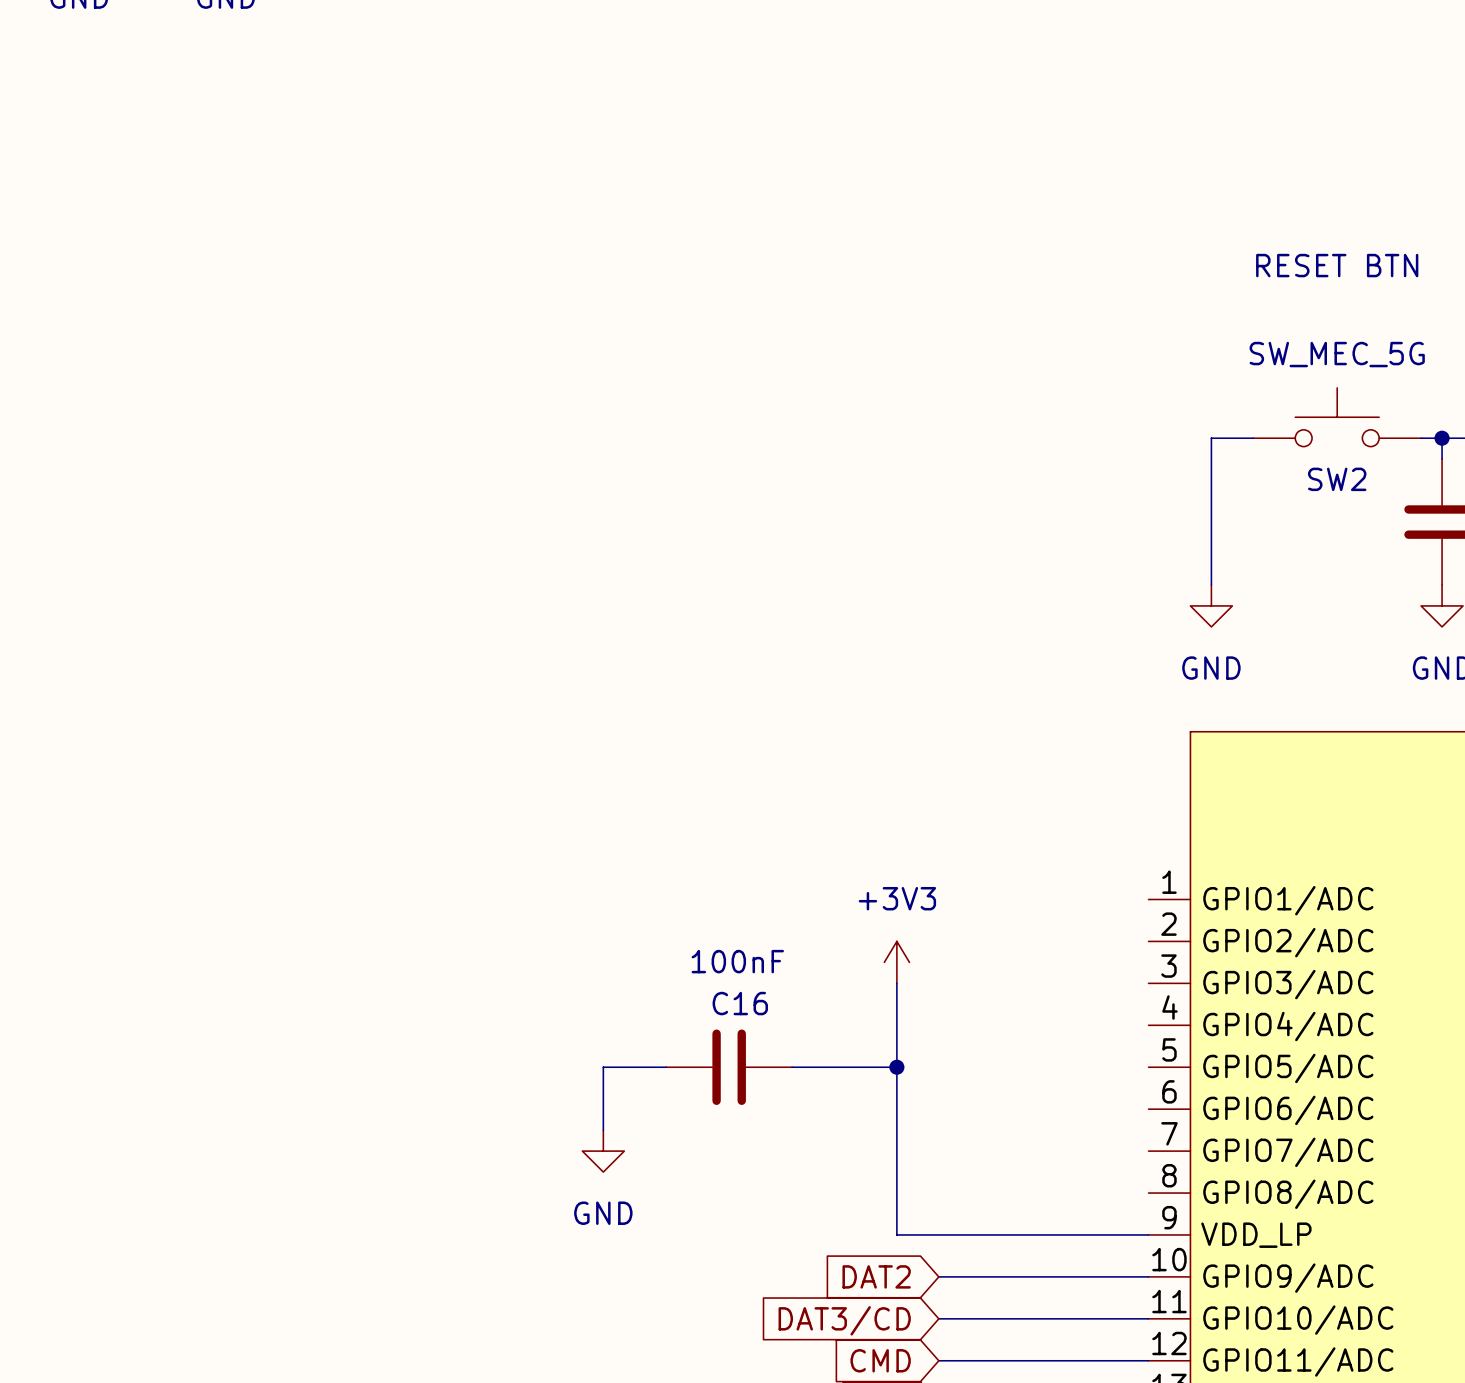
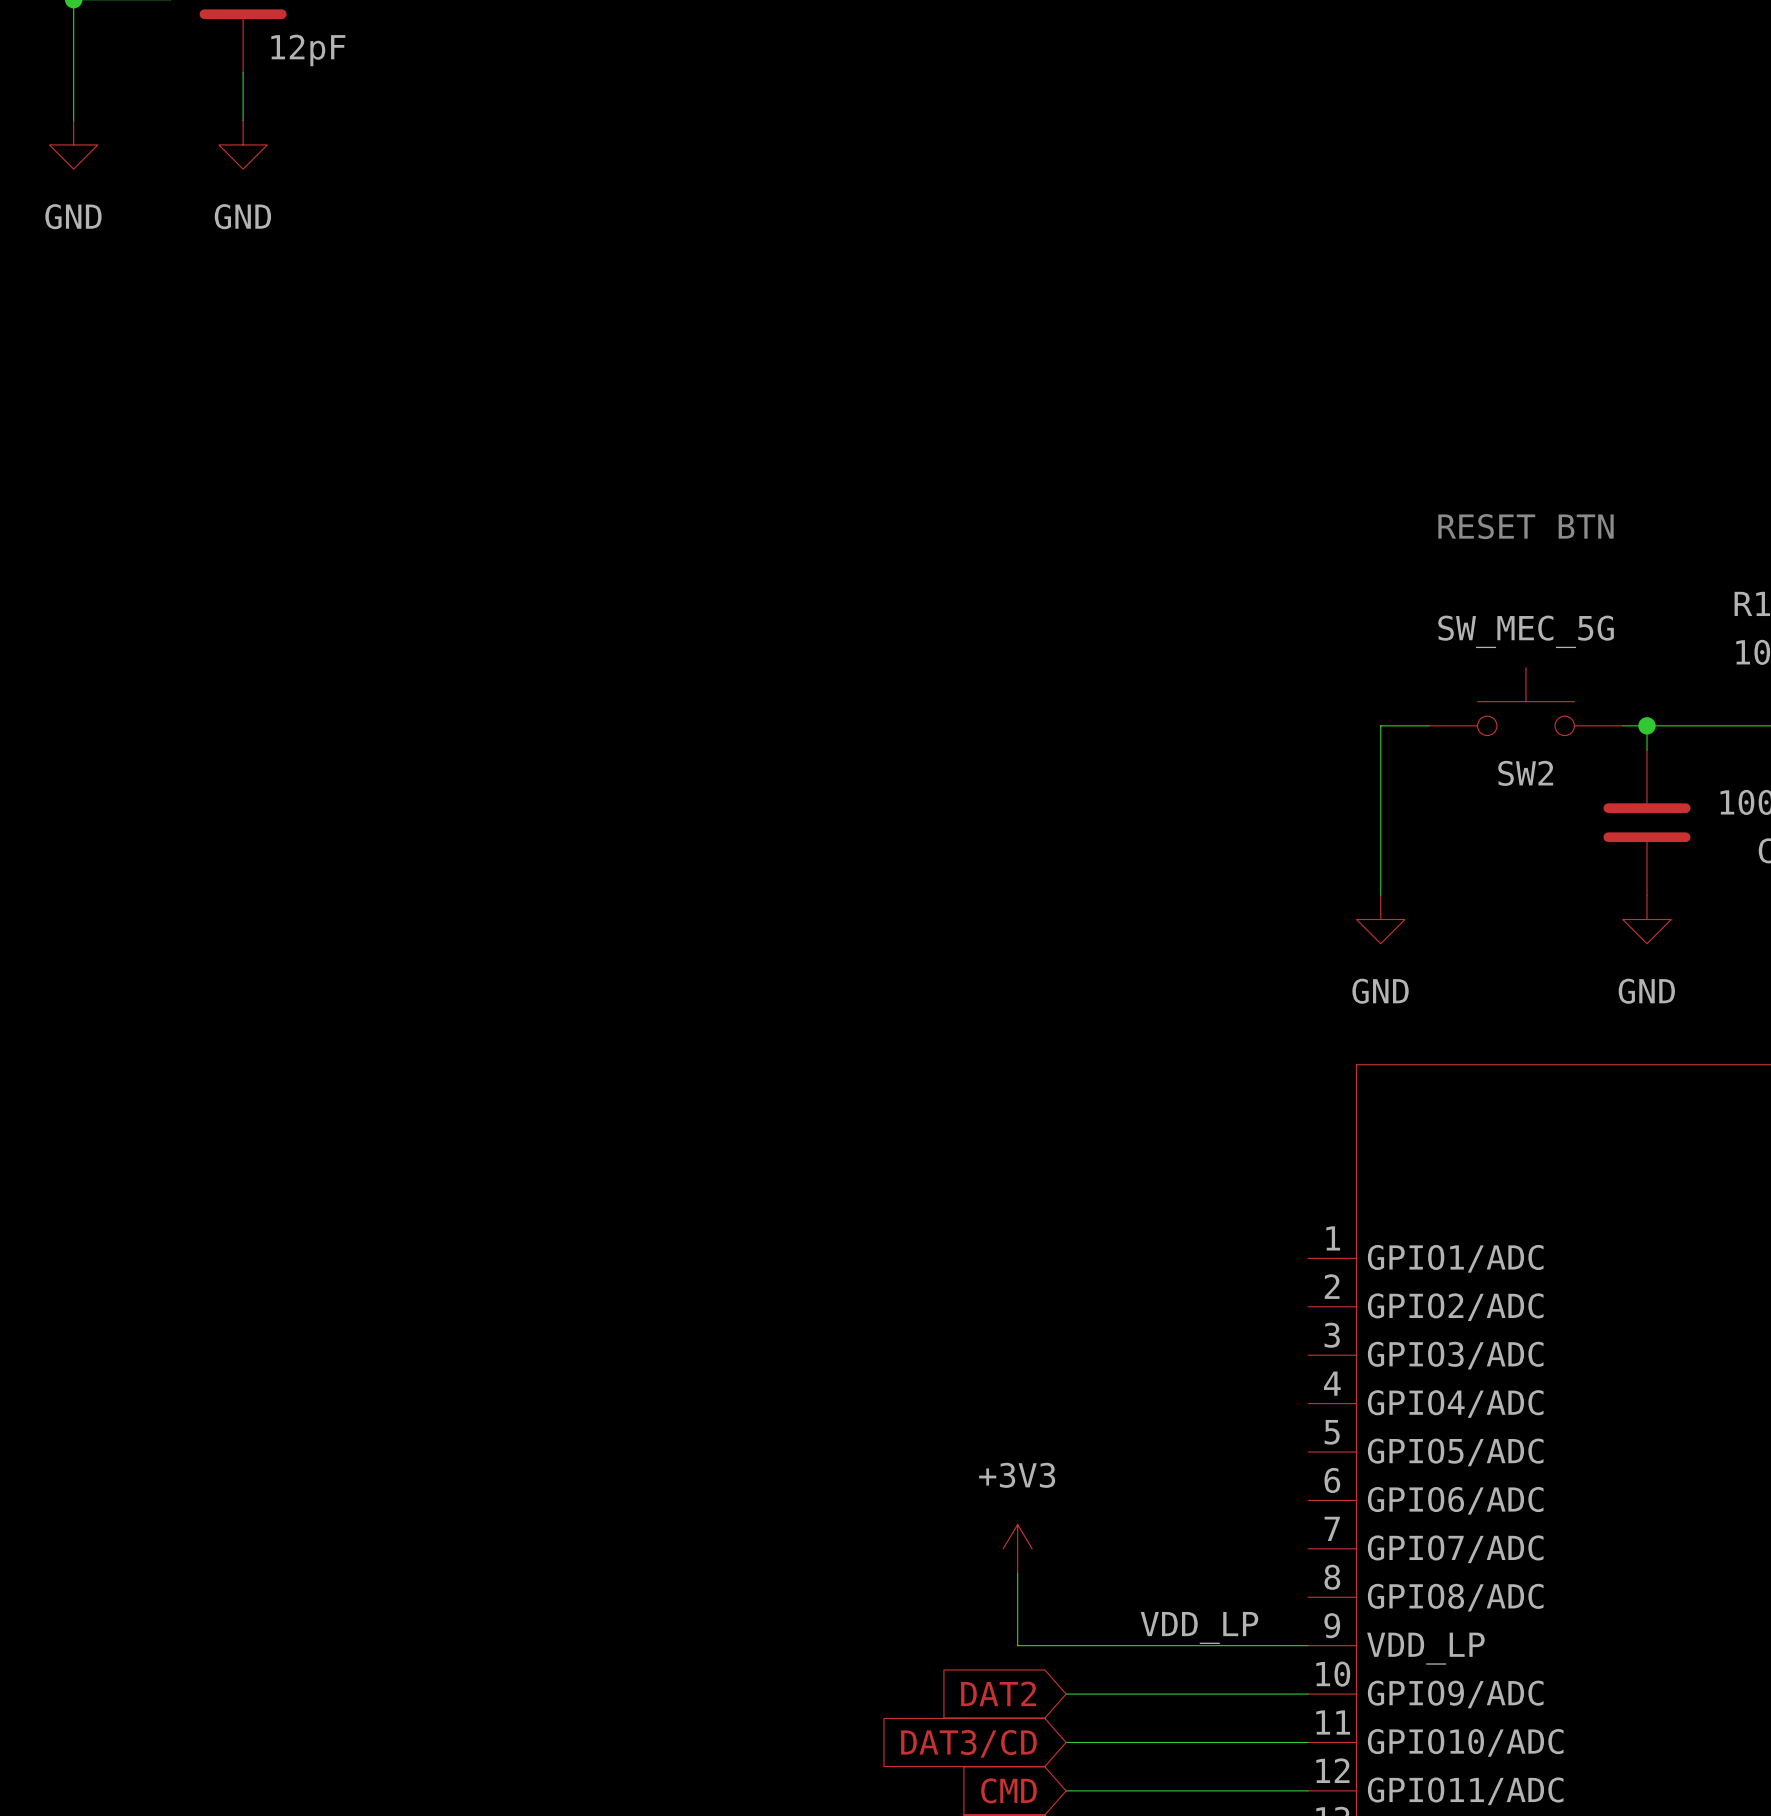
power symbol position: +3V3 (896, 962) -> +3V3 (1017, 1548)
wire: (896, 983) (896, 1172) -> none
wire: (666, 1067) (603, 1067) (603, 1130) -> none
C16: 100nF (729, 1067) -> none
wire: (792, 1067) (896, 1067) -> none
junction: (896, 1067) -> none
power symbol: GND (603, 1151) -> none
label: none -> VDD_LP (1199, 1627)

